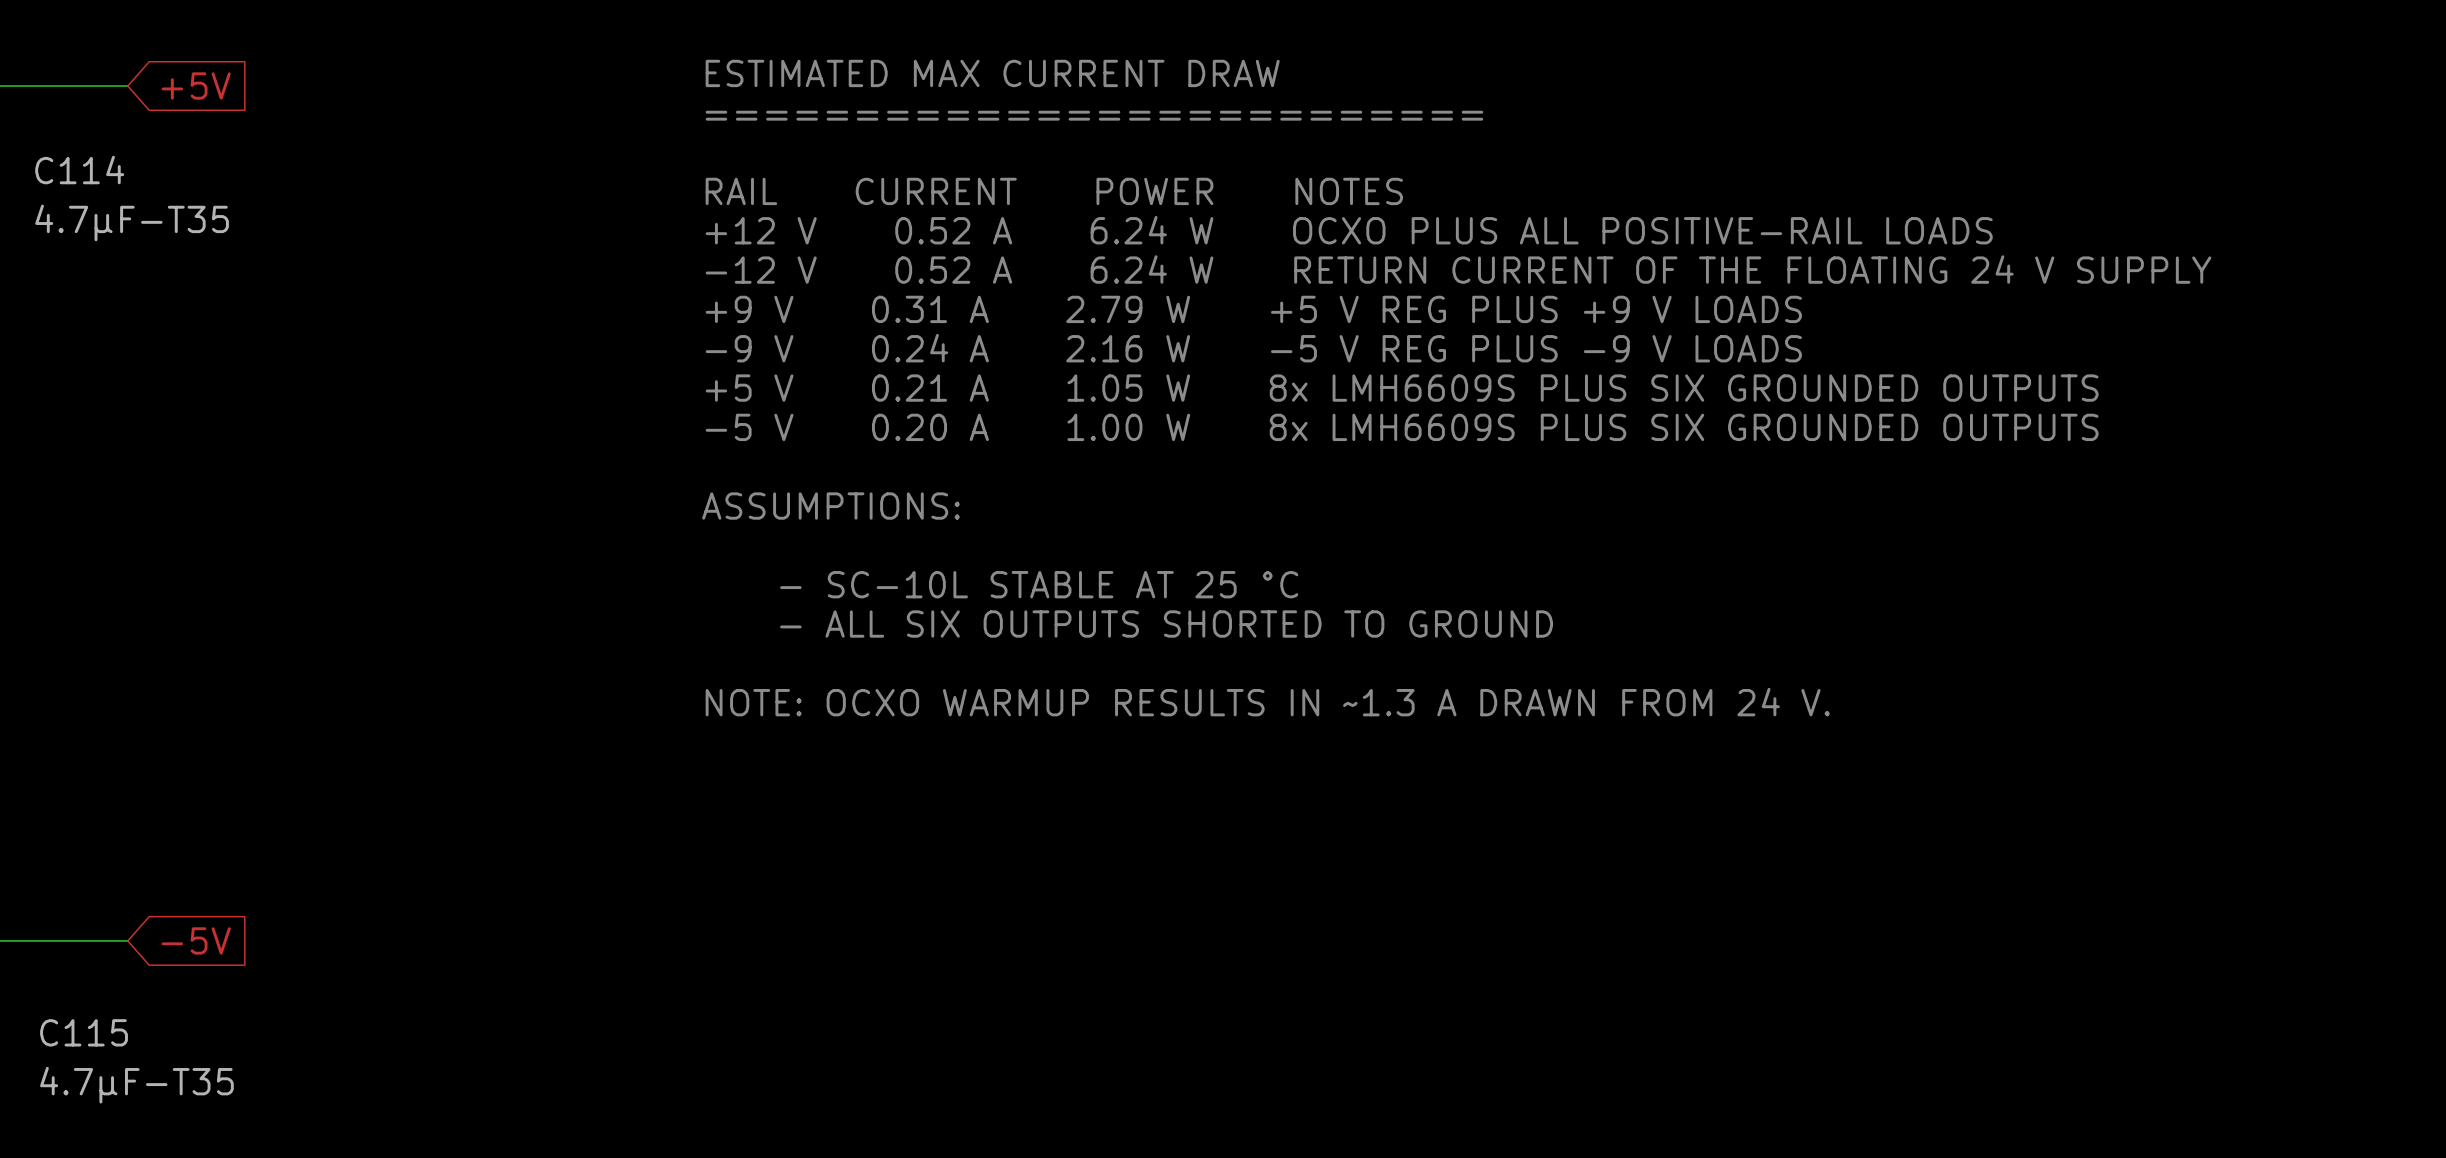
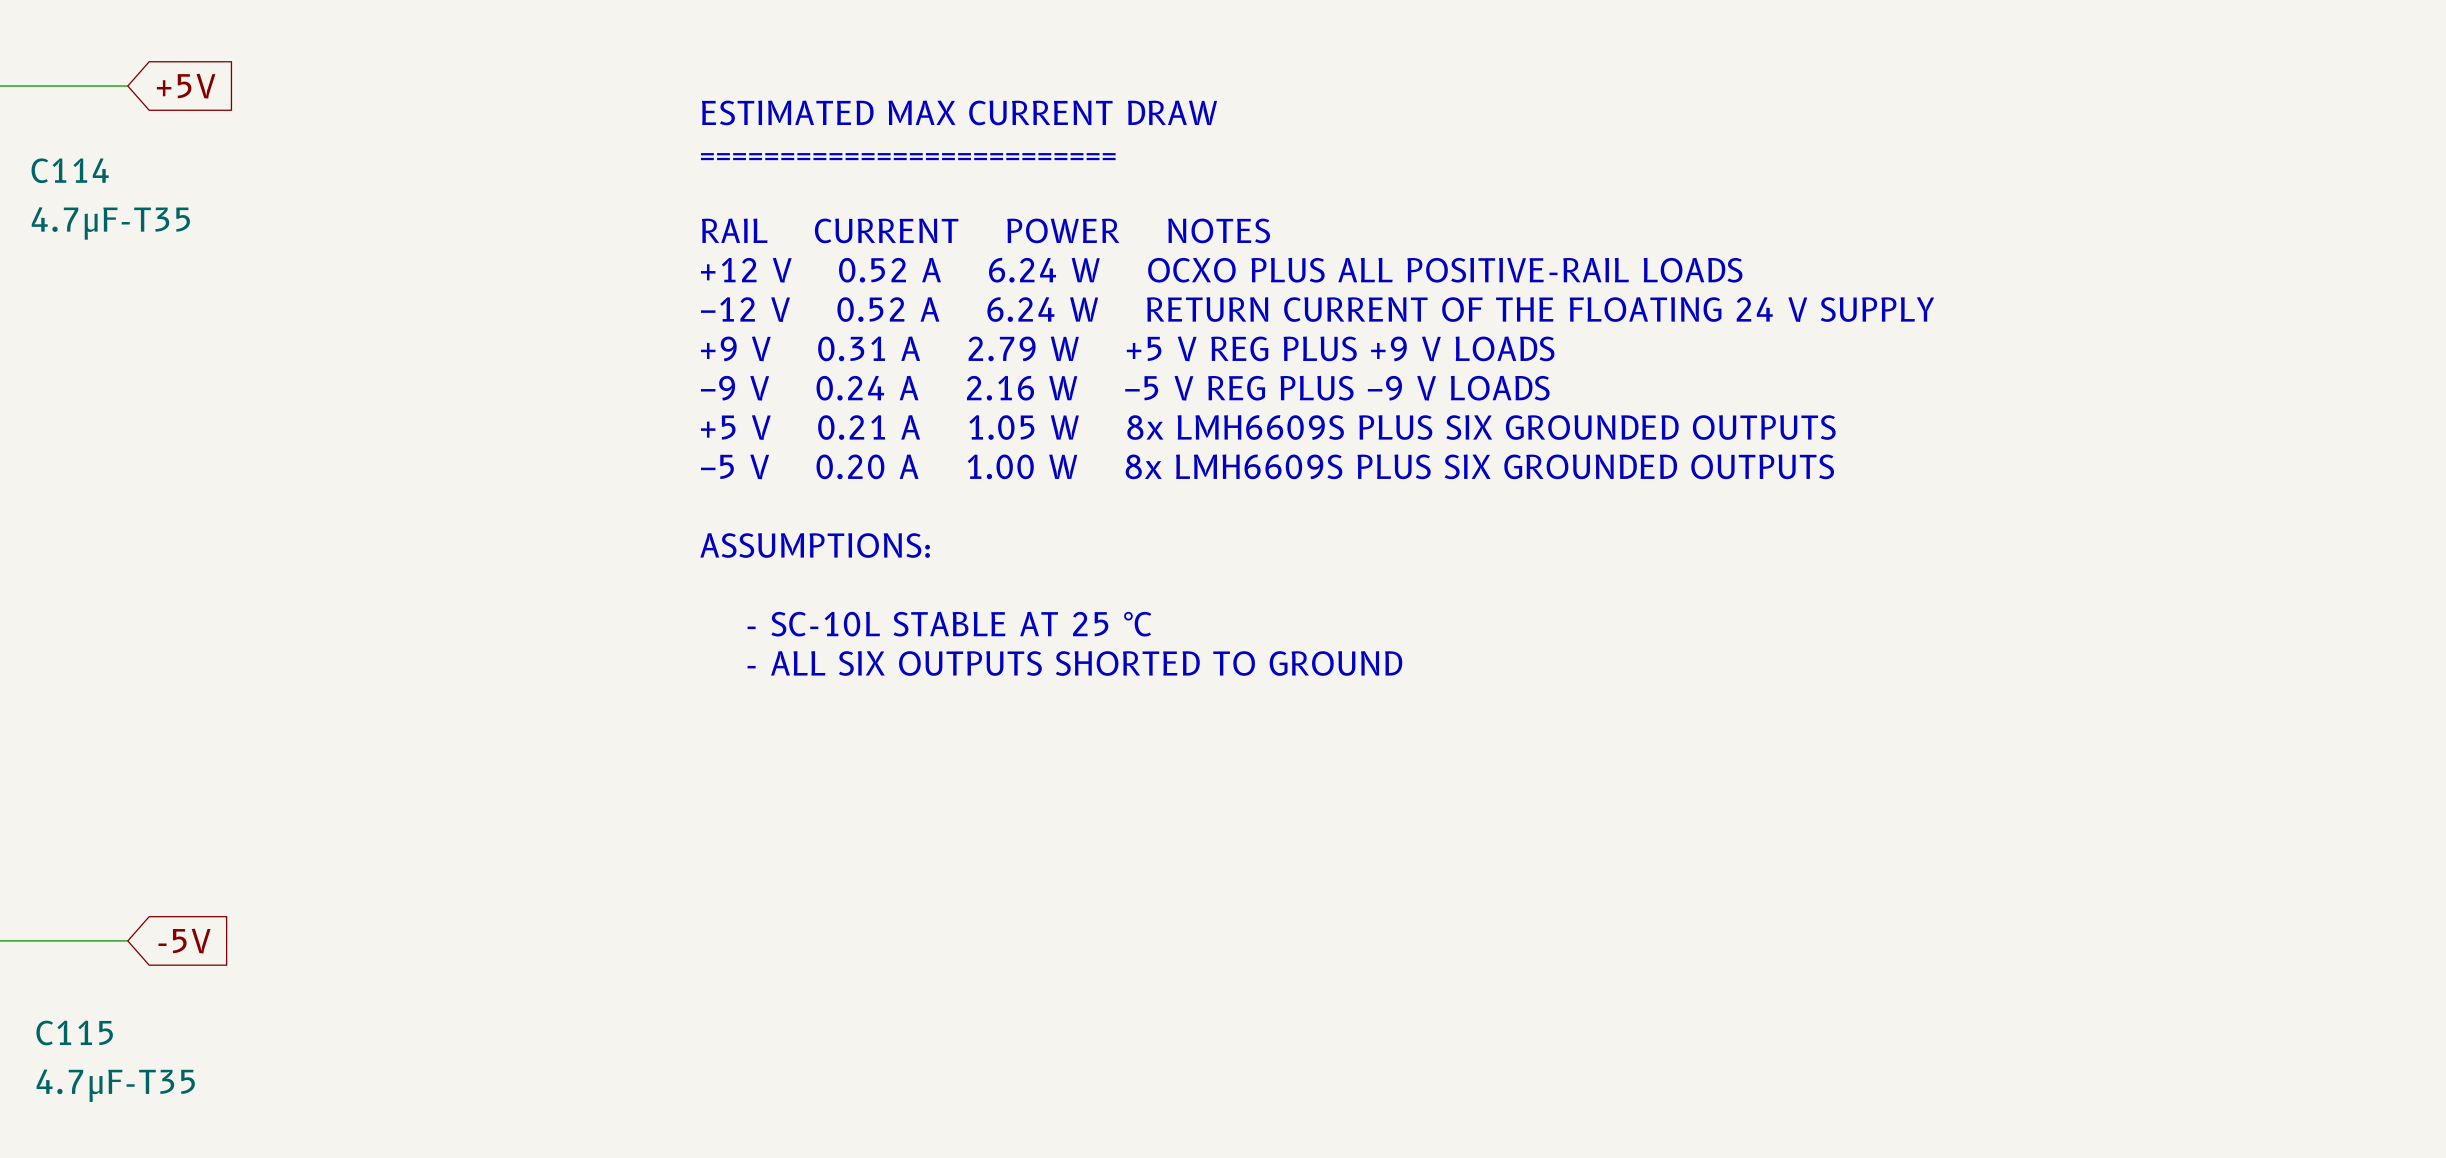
text: ESTIMATED MAX CURRENT DRAW (992, 73) -> none
text: ========================== (1094, 115) -> ESTIMATED MAX CURRENT DRAW (959, 112)
text: none -> ========================== (908, 156)
text: RAIL CURRENT POWER NOTES (1054, 191) -> none
text: +12 V 0.52 A 6.24 W OCXO PLUS ALL POSITIVE-RAIL LOADS (1349, 230) -> RAIL CURRENT POWER NOTES (985, 230)
text: −12 V 0.52 A 6.24 W RETURN CURRENT OF THE FLOATING 24 V SUPPLY (1458, 269) -> +12 V 0.52 A 6.24 W OCXO PLUS ALL POSITIVE-RAIL LOADS (1221, 270)
text: +9 V 0.31 A 2.79 W +5 V REG PLUS +9 V LOADS (1253, 309) -> −12 V 0.52 A 6.24 W RETURN CURRENT OF THE FLOATING 24 V SUPPLY (1317, 309)
text: −9 V 0.24 A 2.16 W −5 V REG PLUS −9 V LOADS (1253, 348) -> +9 V 0.31 A 2.79 W +5 V REG PLUS +9 V LOADS (1127, 348)
text: +5 V 0.21 A 1.05 W 8x LMH6609S PLUS SIX GROUNDED OUTPUTS (1402, 388) -> −9 V 0.24 A 2.16 W −5 V REG PLUS −9 V LOADS (1125, 388)
text: −5 V 0.20 A 1.00 W 8x LMH6609S PLUS SIX GROUNDED OUTPUTS (1402, 427) -> +5 V 0.21 A 1.05 W 8x LMH6609S PLUS SIX GROUNDED OUTPUTS (1268, 427)
text: none -> −5 V 0.20 A 1.00 W 8x LMH6609S PLUS SIX GROUNDED OUTPUTS (1267, 466)
text position: ASSUMPTIONS: (830, 506) -> ASSUMPTIONS: (815, 545)
text: - SC-10L STABLE AT 25 °C (1039, 584) -> none
text: - ALL SIX OUTPUTS SHORTED TO GROUND (1166, 624) -> - SC-10L STABLE AT 25 °C (949, 624)
text: none -> - ALL SIX OUTPUTS SHORTED TO GROUND (1074, 663)
text: NOTE: OCXO WARMUP RESULTS IN ~1.3 A DRAWN FROM 24 V. (1267, 702) -> none

